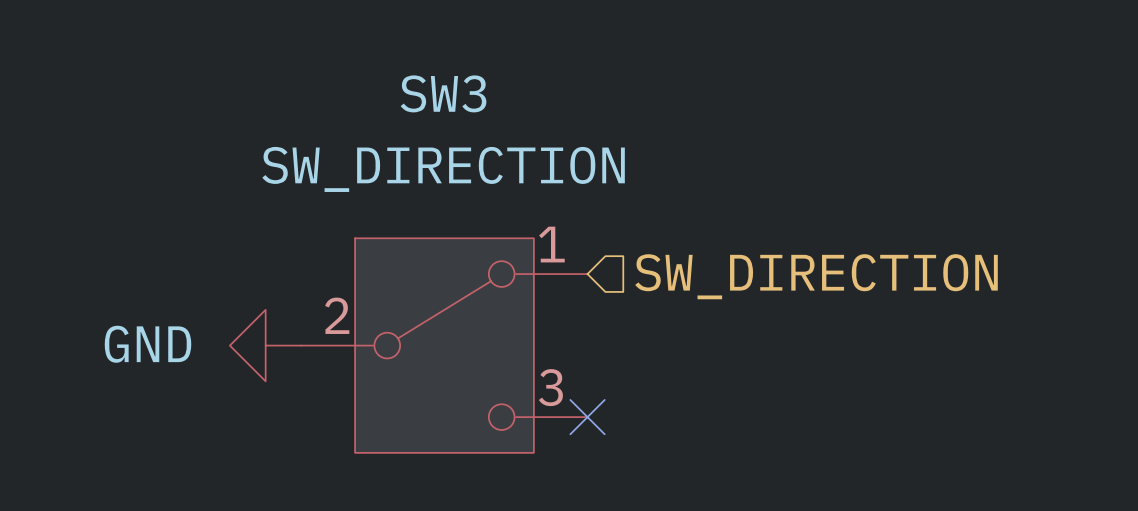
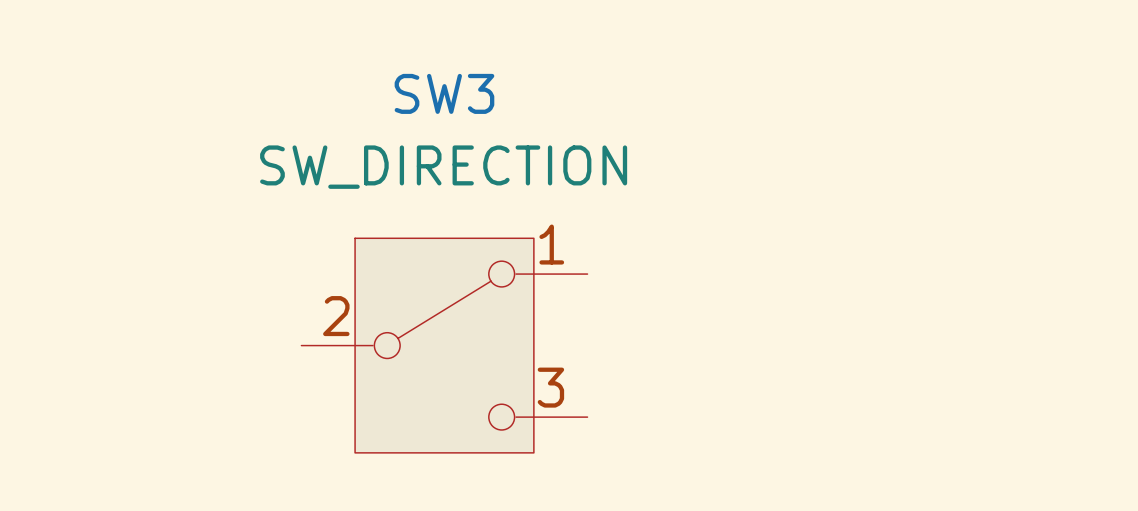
hierarchical label: SW_DIRECTION (816, 276) -> none
power symbol: GND (265, 345) -> none
no-connect mark: (587, 417) -> none

